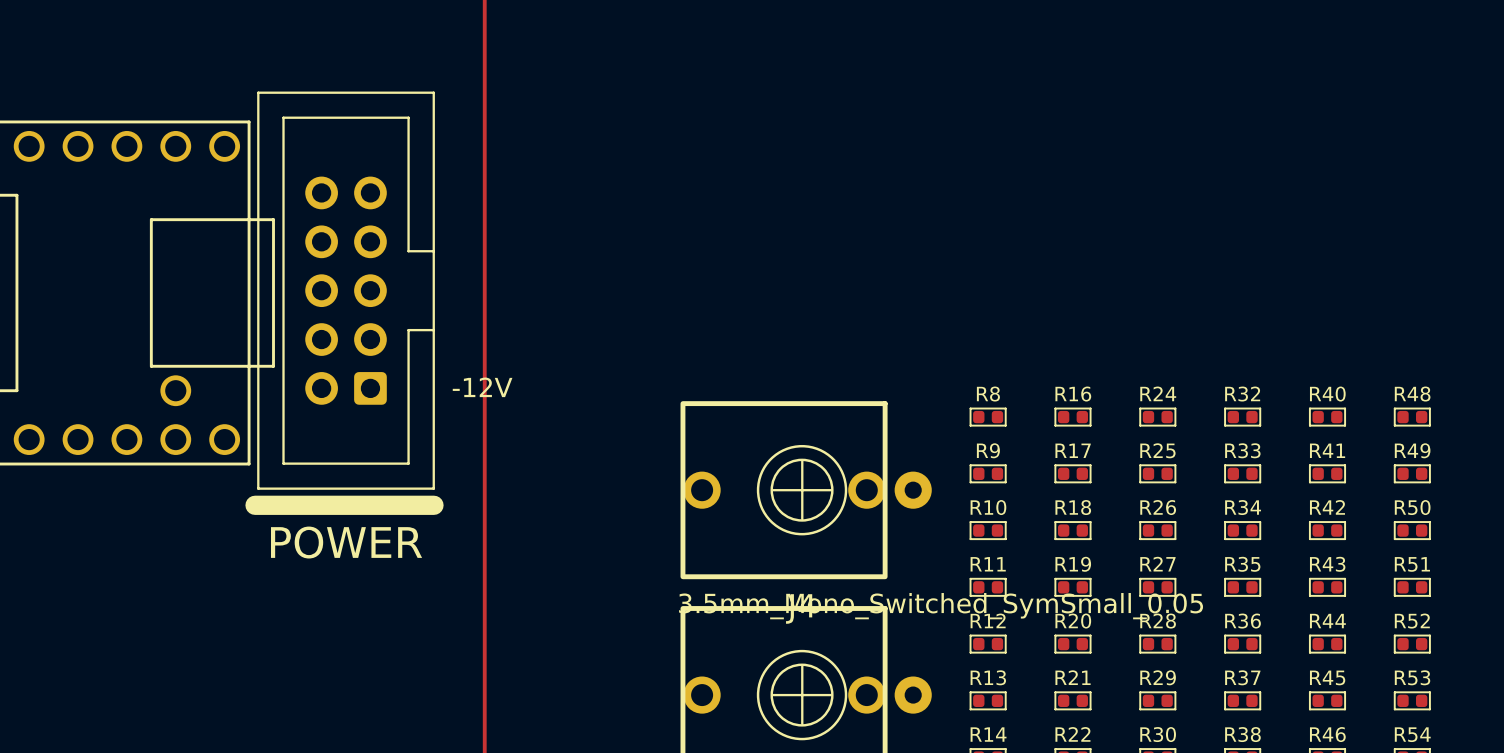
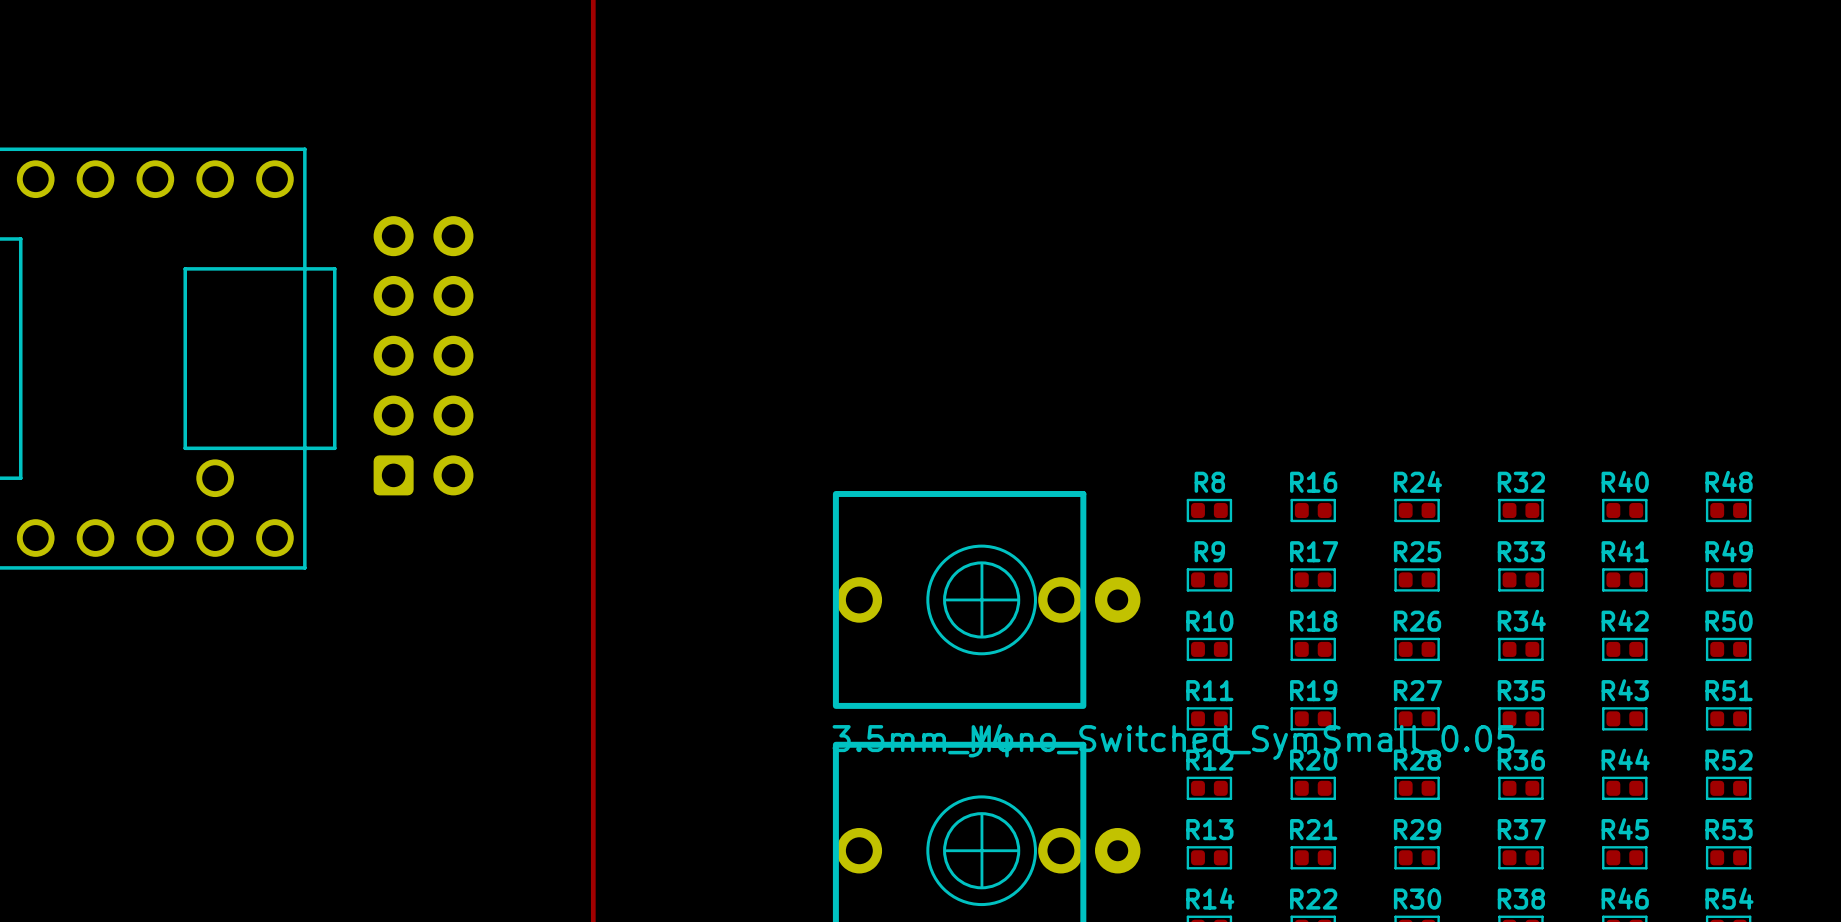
part side: top (344, 303) -> bottom (423, 355)

